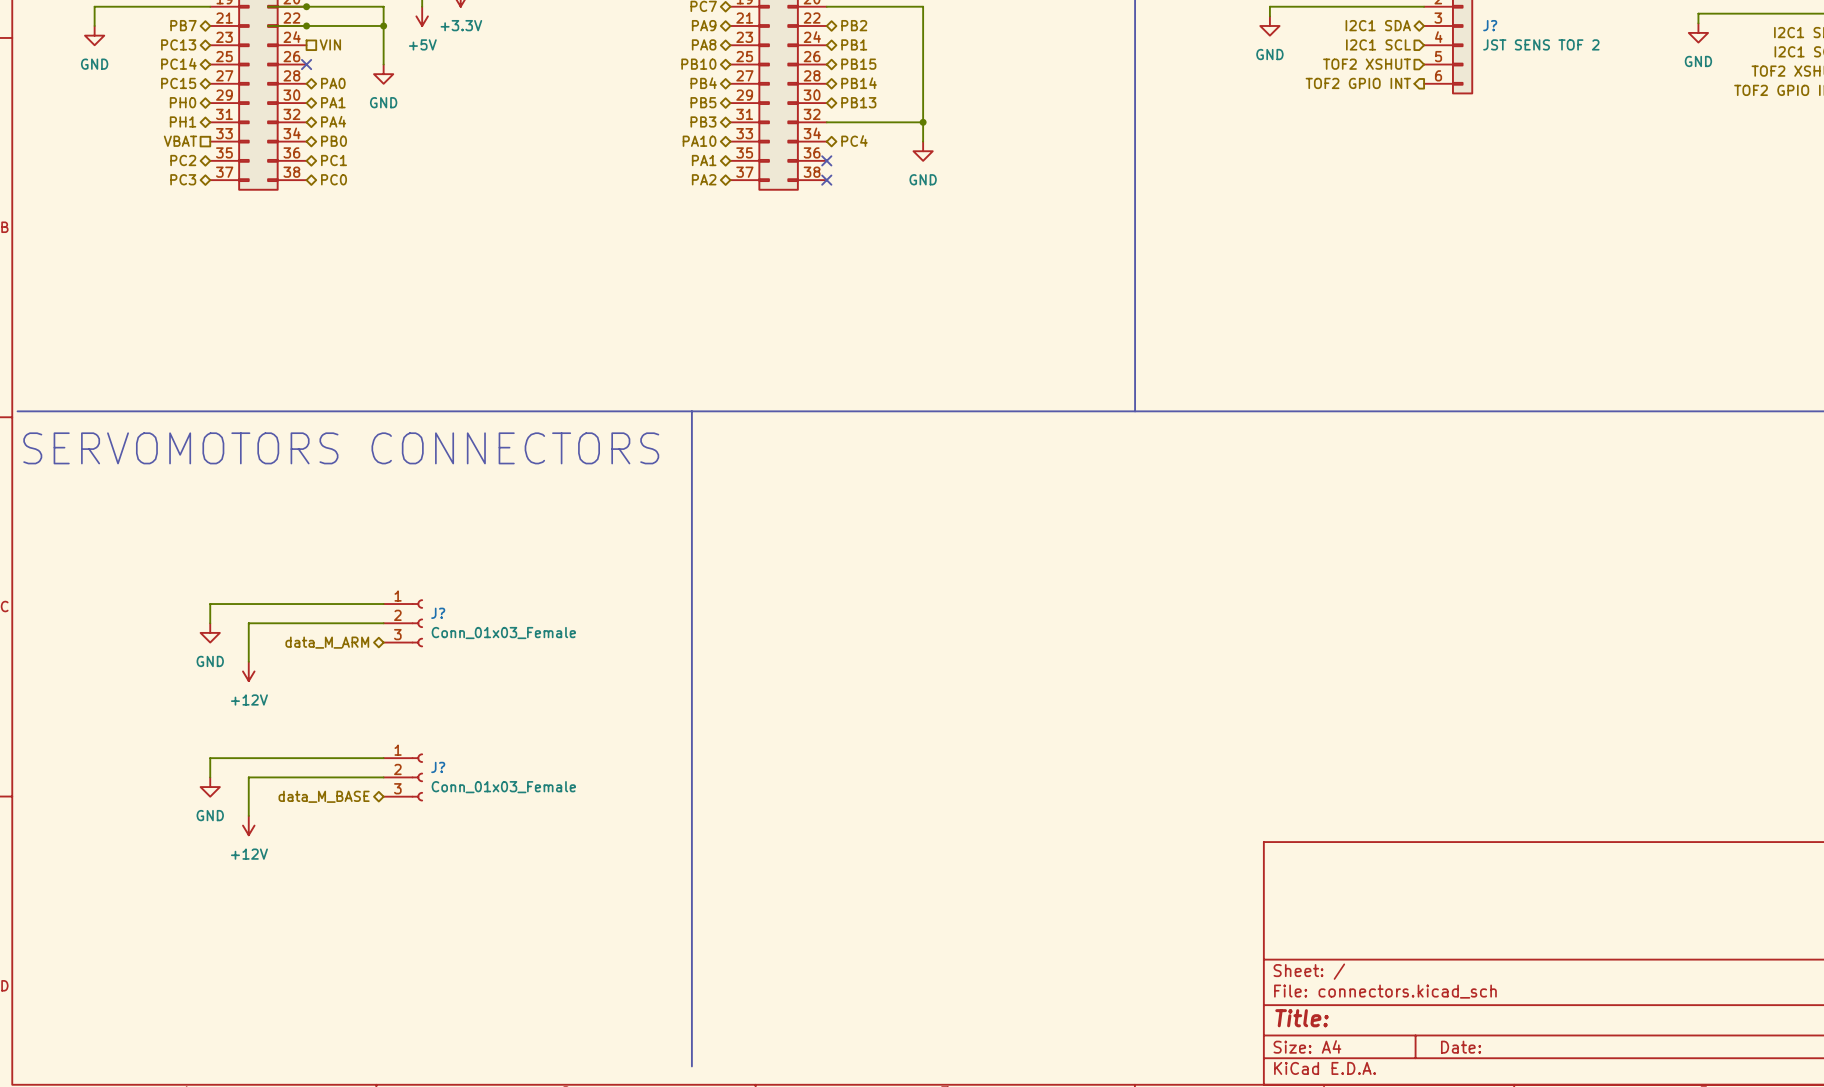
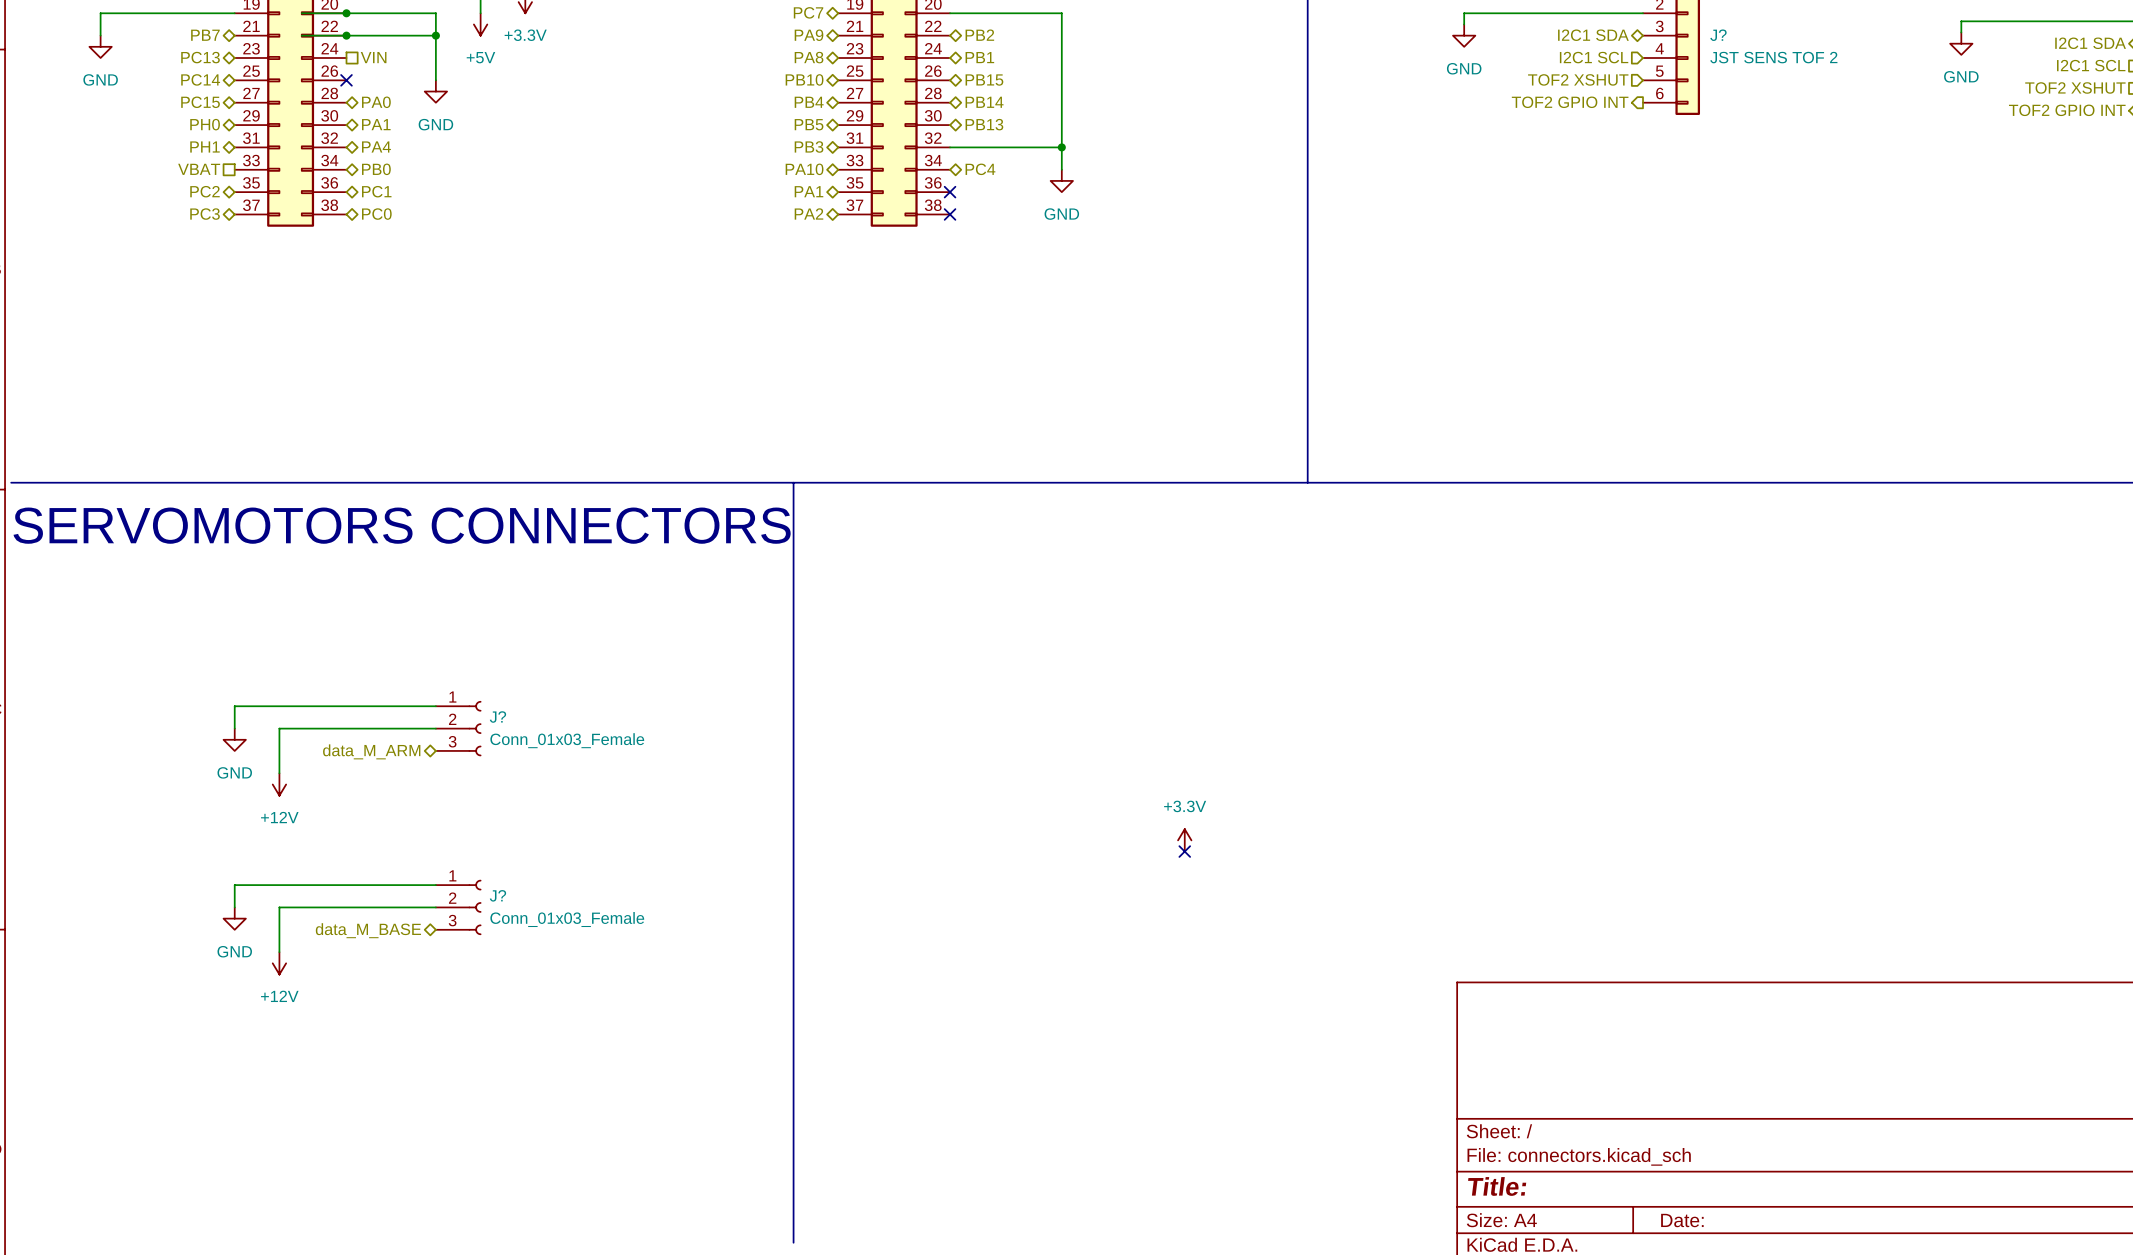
power symbol: none -> +3.3V (1184, 840)
no-connect mark: none -> (1184, 851)

